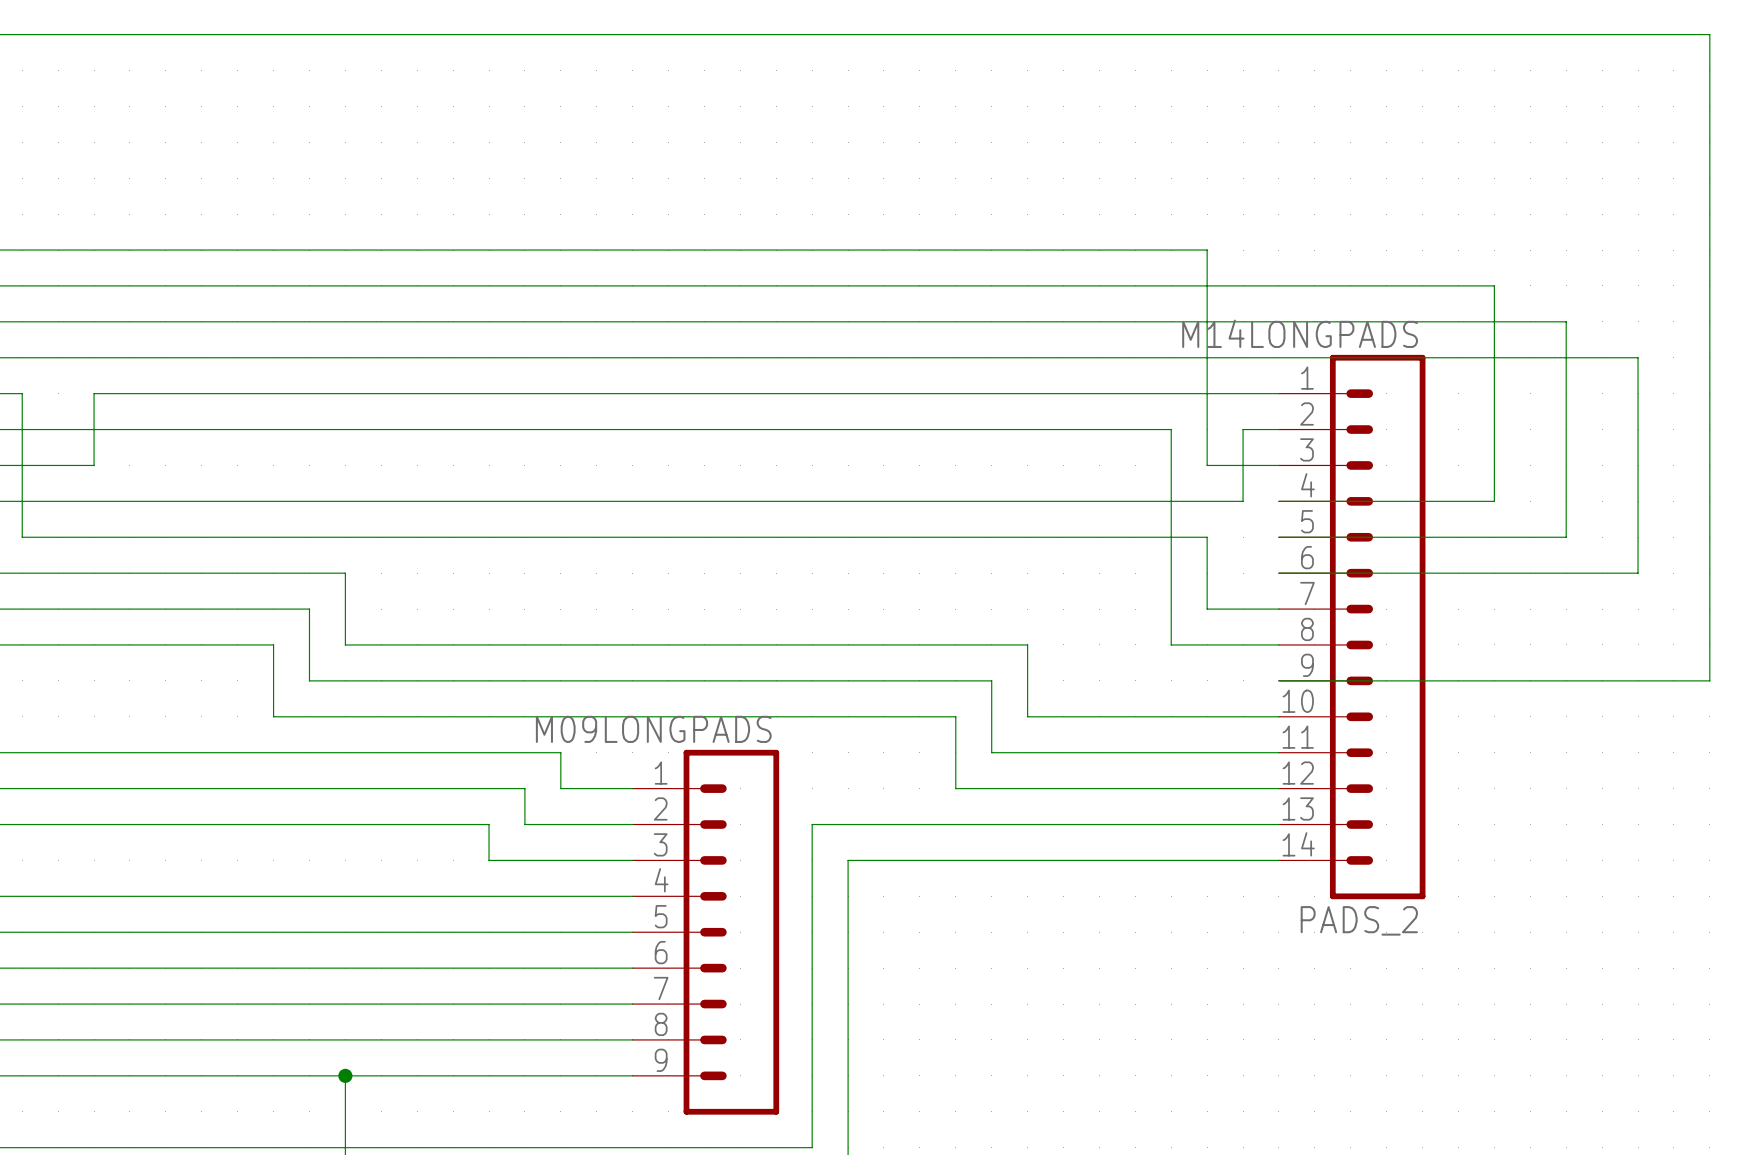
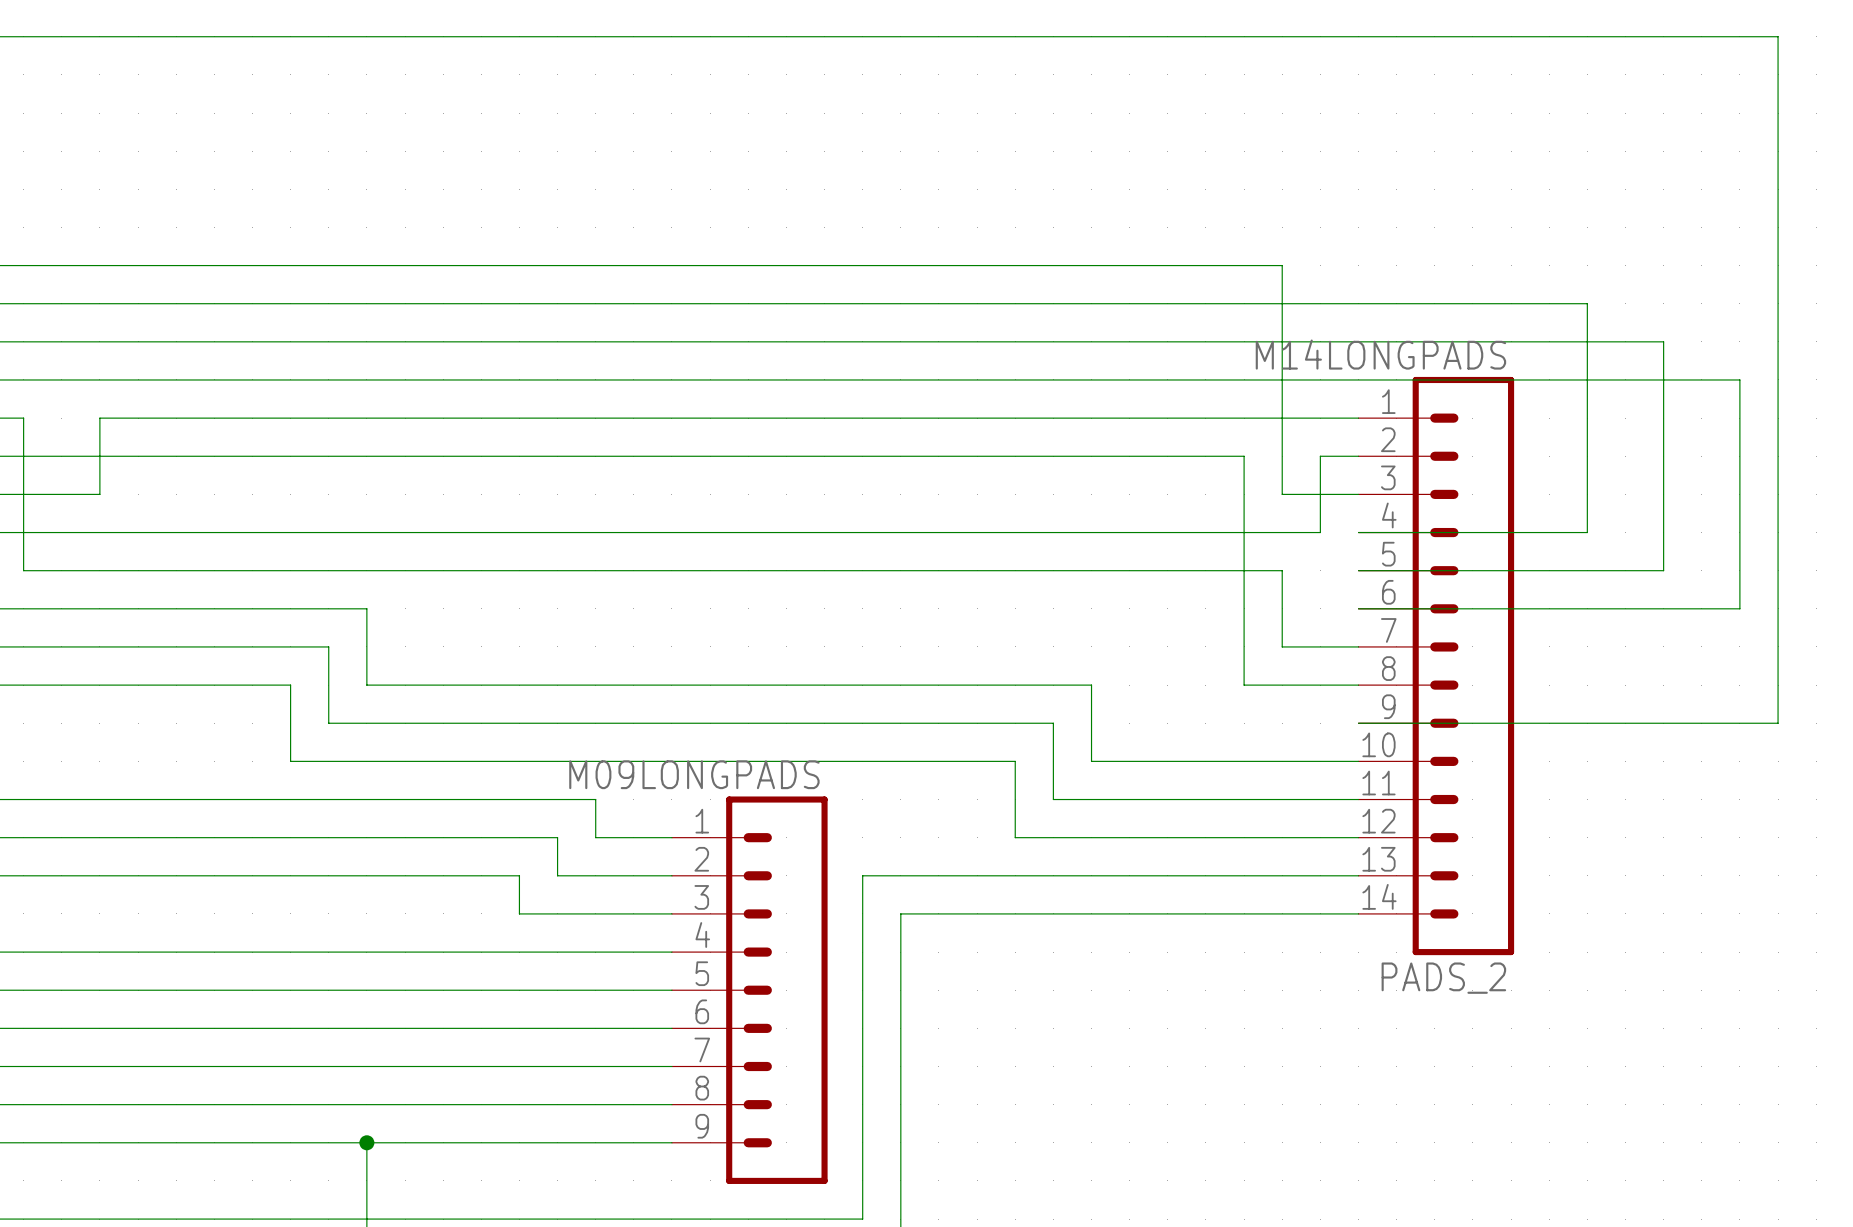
wire: (1673, 34) (1709, 34) (1709, 680) (1673, 680) -> (1778, 36) (1778, 723)

